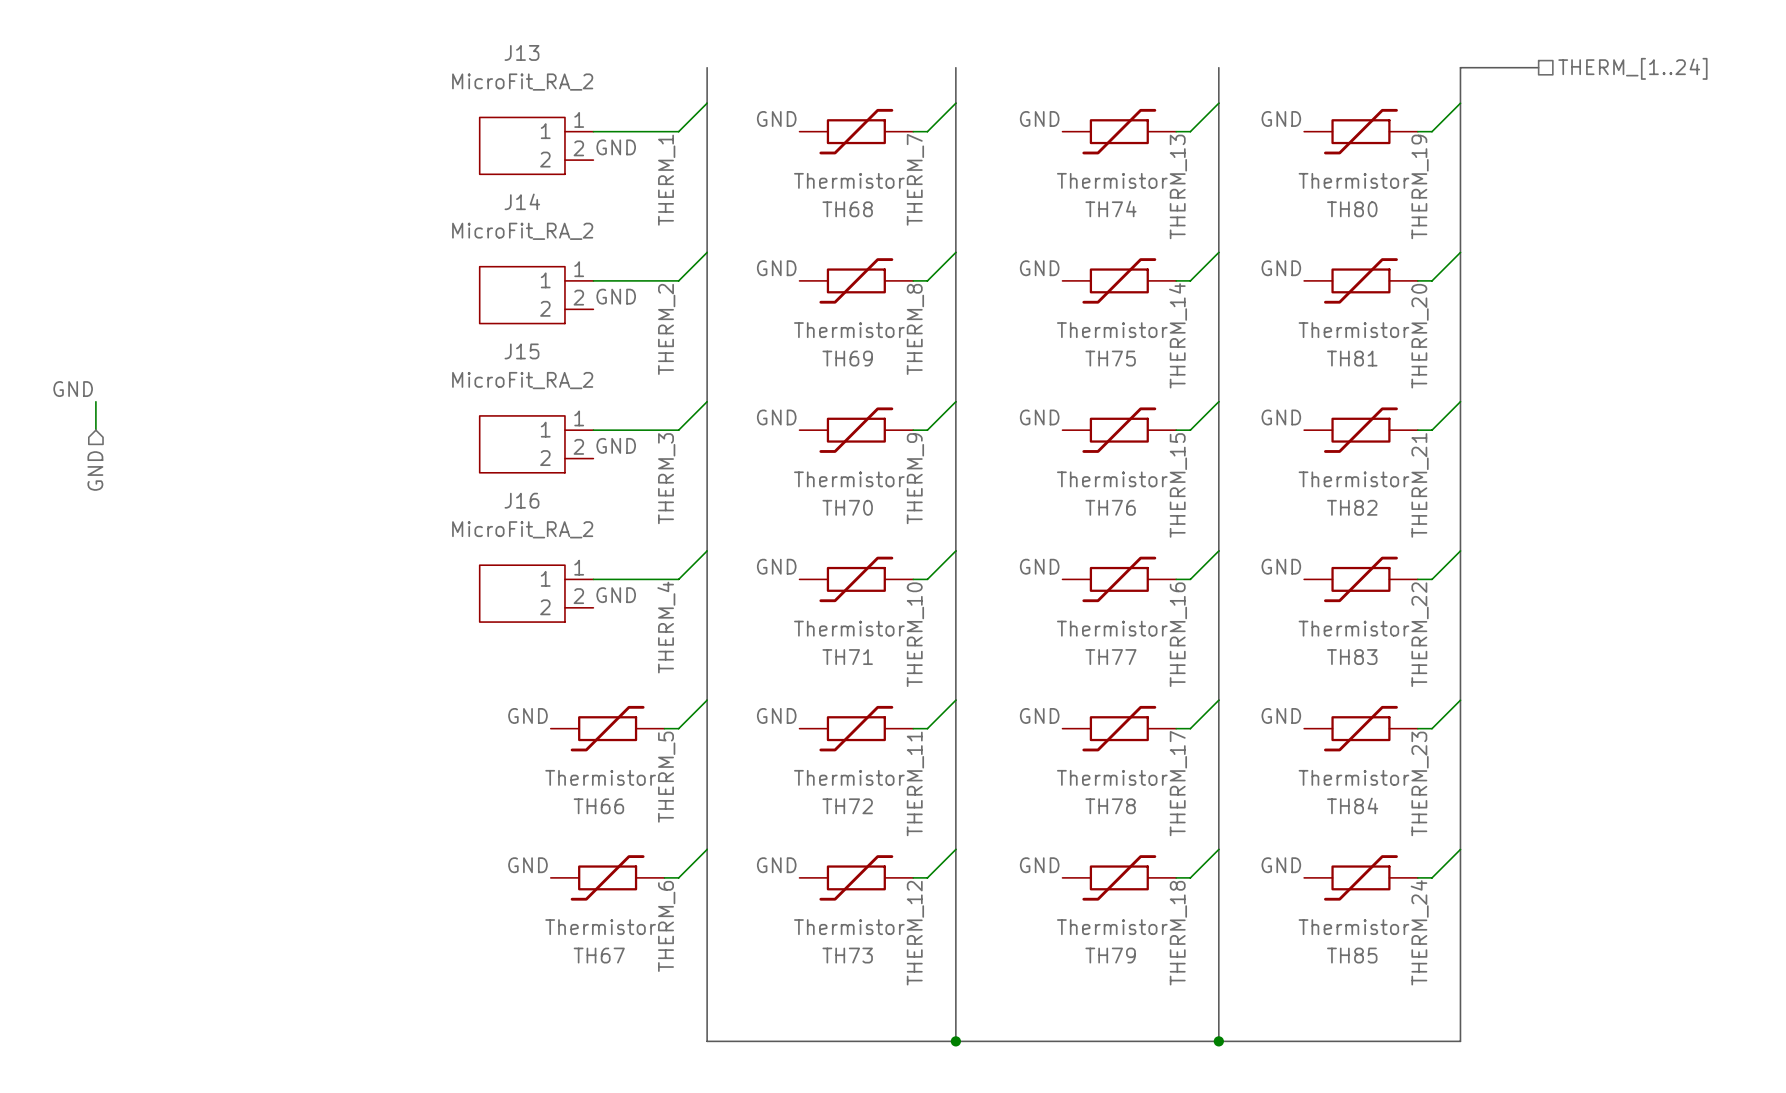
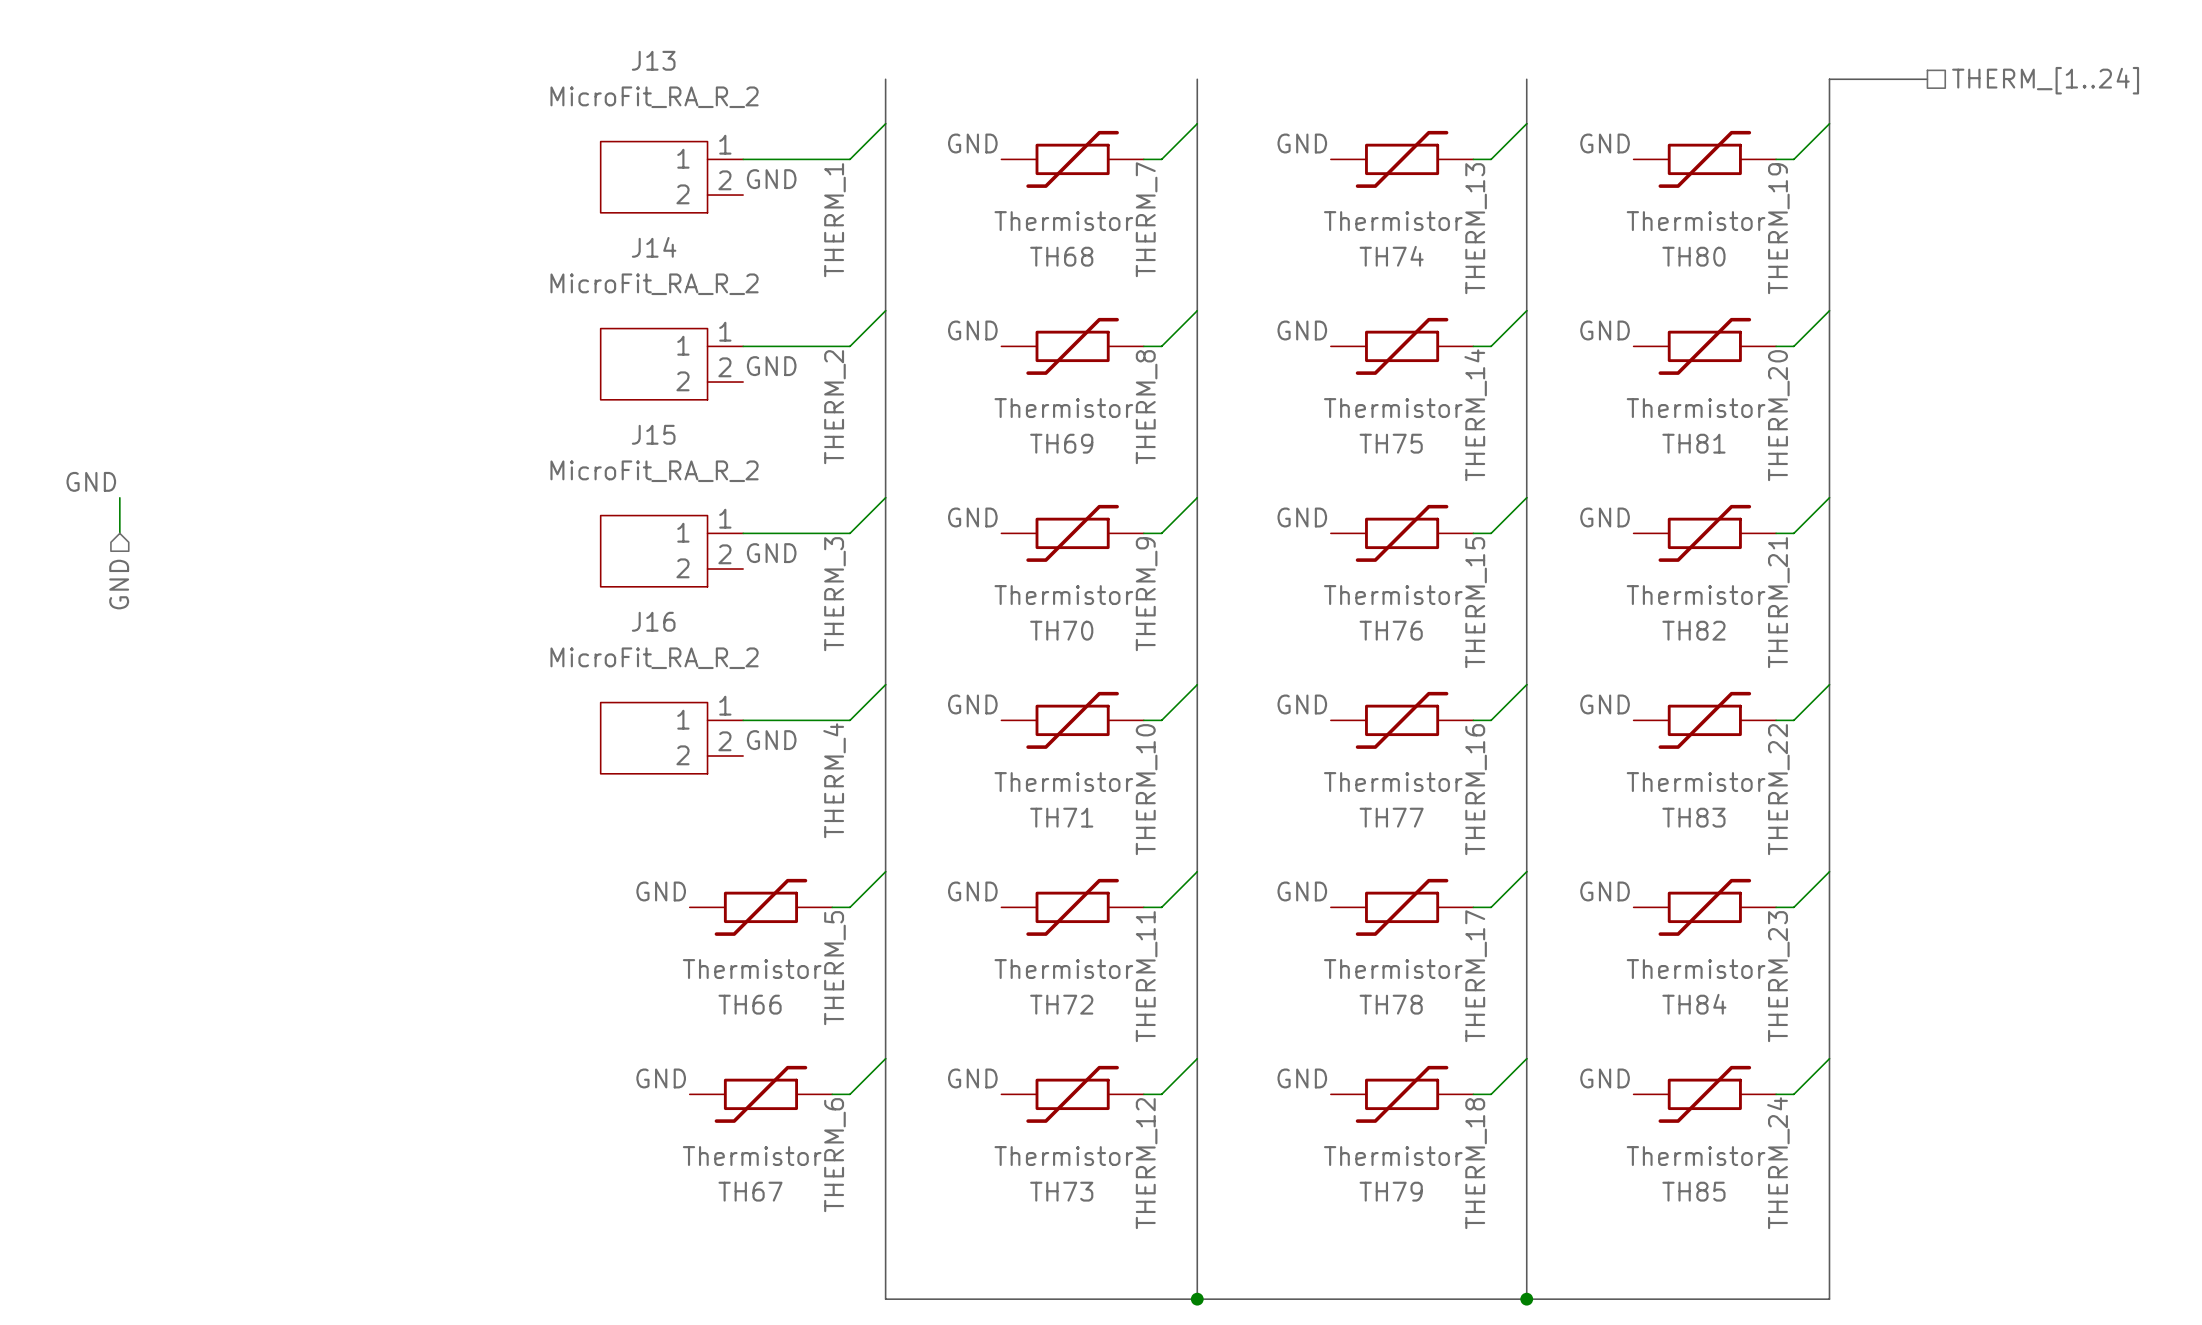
J13 value: MicroFit_RA_2 (522, 82) -> MicroFit_RA_R_2 (654, 97)
J14 value: MicroFit_RA_2 (522, 231) -> MicroFit_RA_R_2 (654, 284)
J15 value: MicroFit_RA_2 (522, 380) -> MicroFit_RA_R_2 (654, 471)
J16 value: MicroFit_RA_2 (522, 529) -> MicroFit_RA_R_2 (654, 658)

